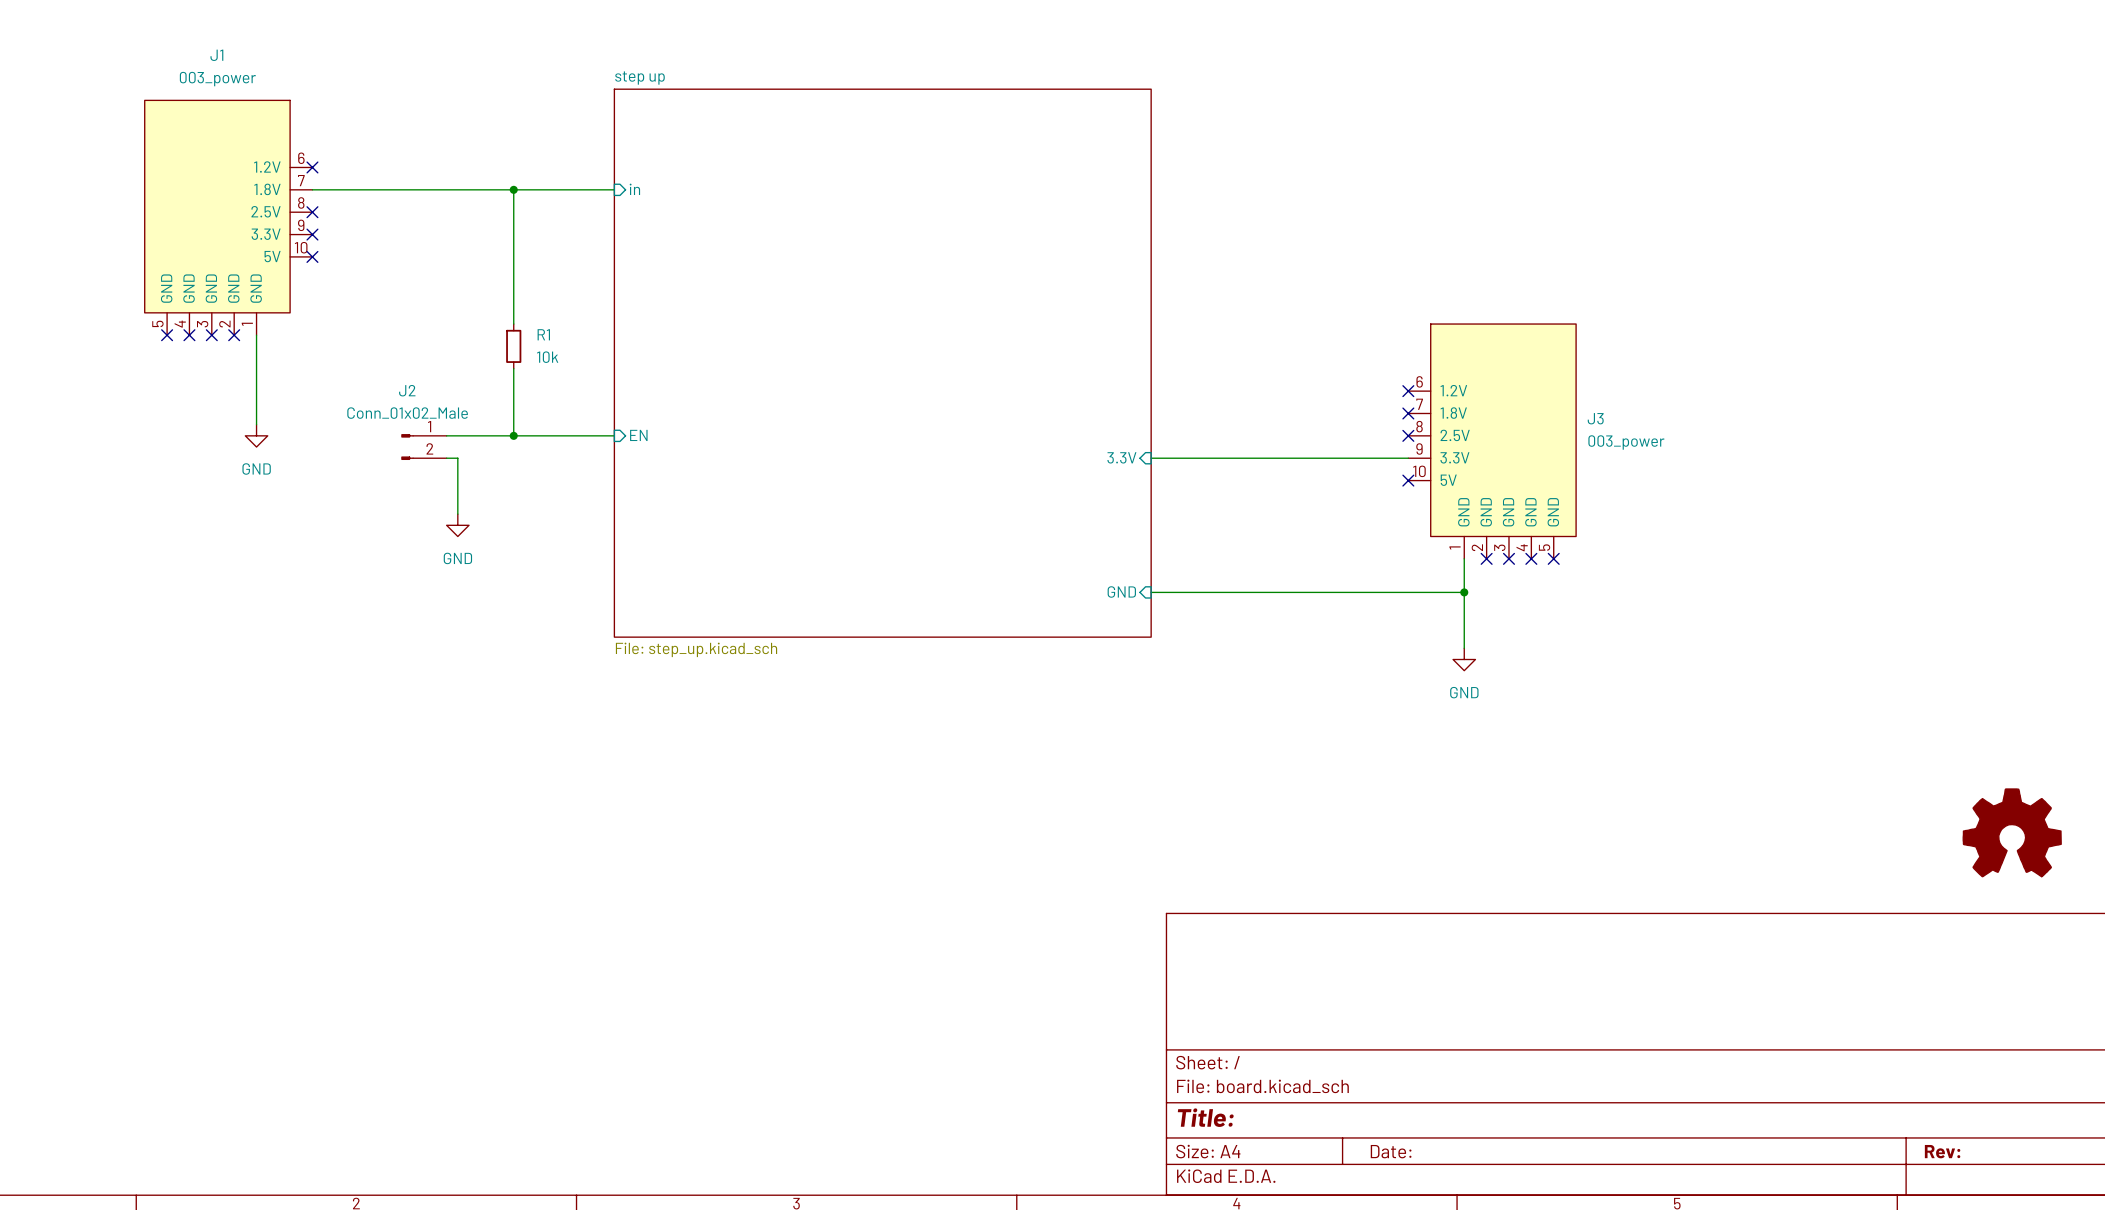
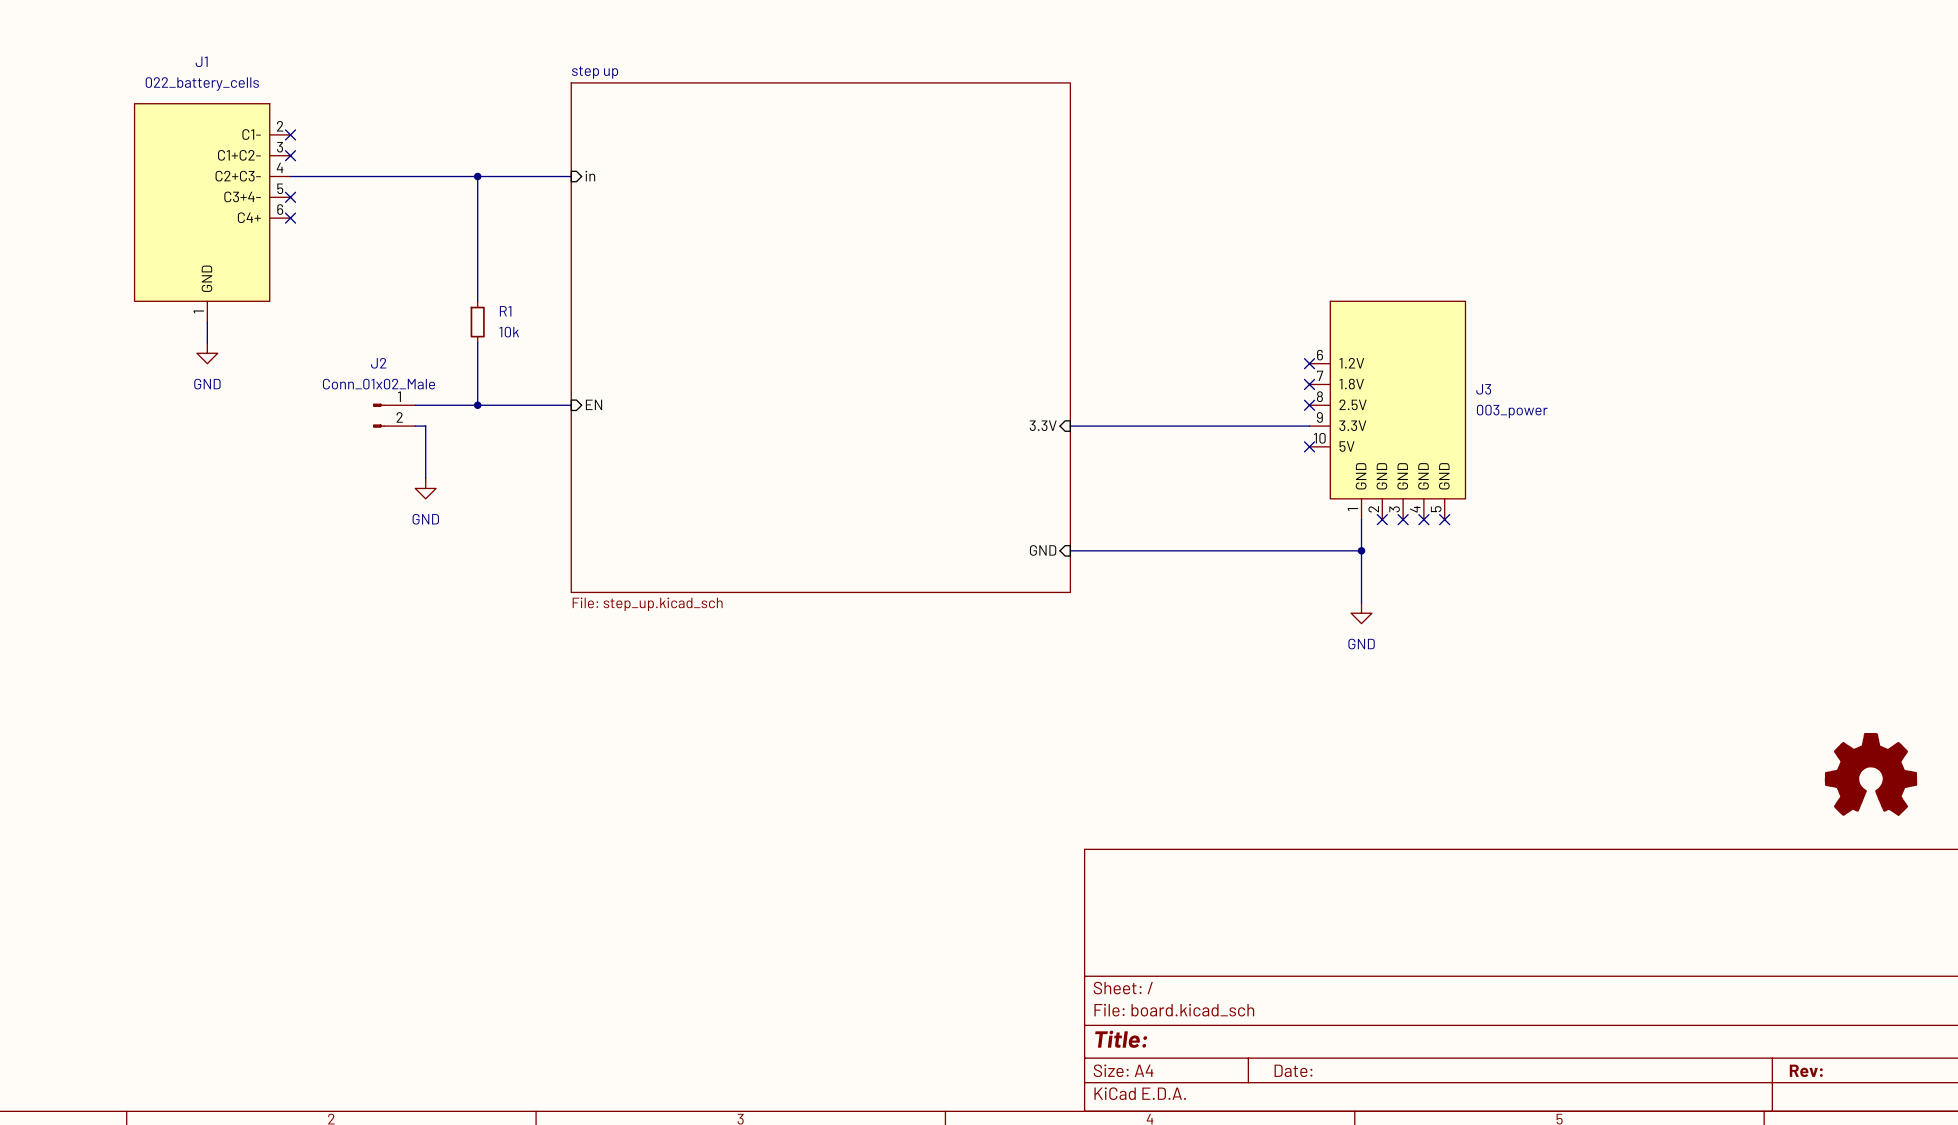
J1 value: 003_power (217, 79) -> 022_battery_cells (202, 83)
J1 symbol: [144, 100, 313, 336] -> [134, 103, 291, 323]
no-connect mark: none -> (290, 134)
no-connect mark: (312, 256) -> none
no-connect mark: (167, 335) -> none
no-connect mark: (189, 335) -> none
no-connect mark: (211, 335) -> none
no-connect mark: (234, 335) -> none
wire: (256, 335) (256, 424) -> none
wire: none -> (207, 322) (207, 342)
power symbol position: GND (256, 435) -> GND (207, 353)

